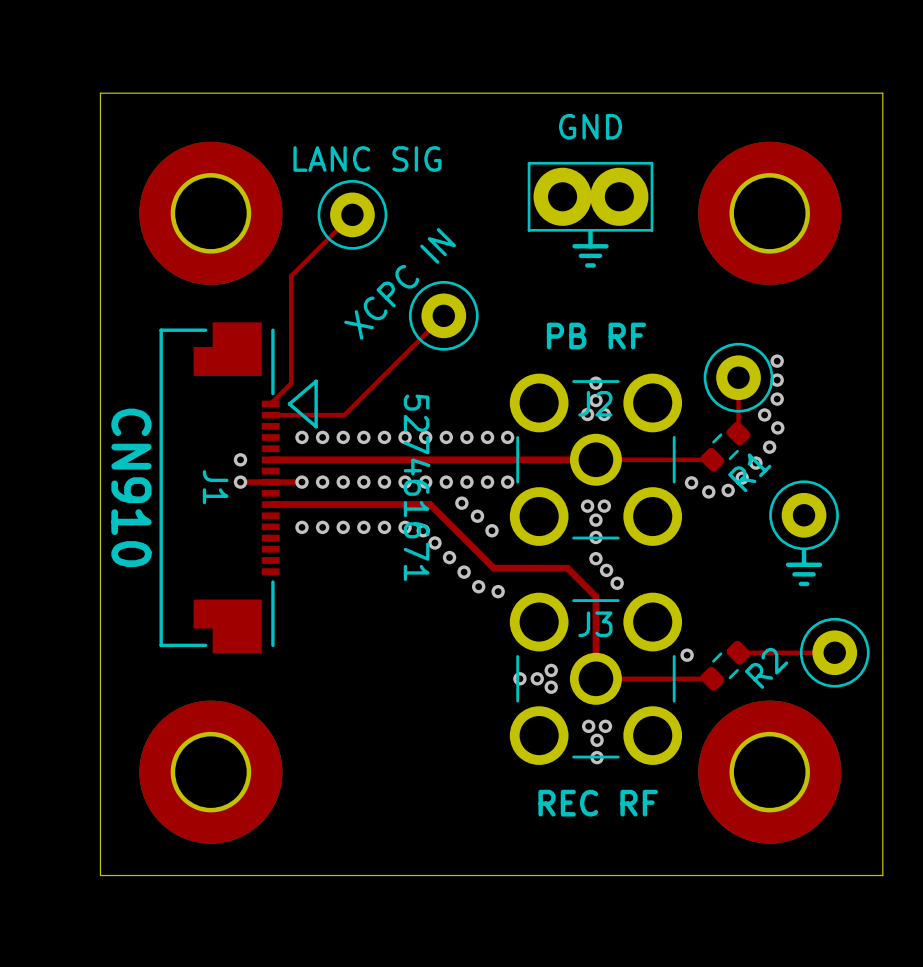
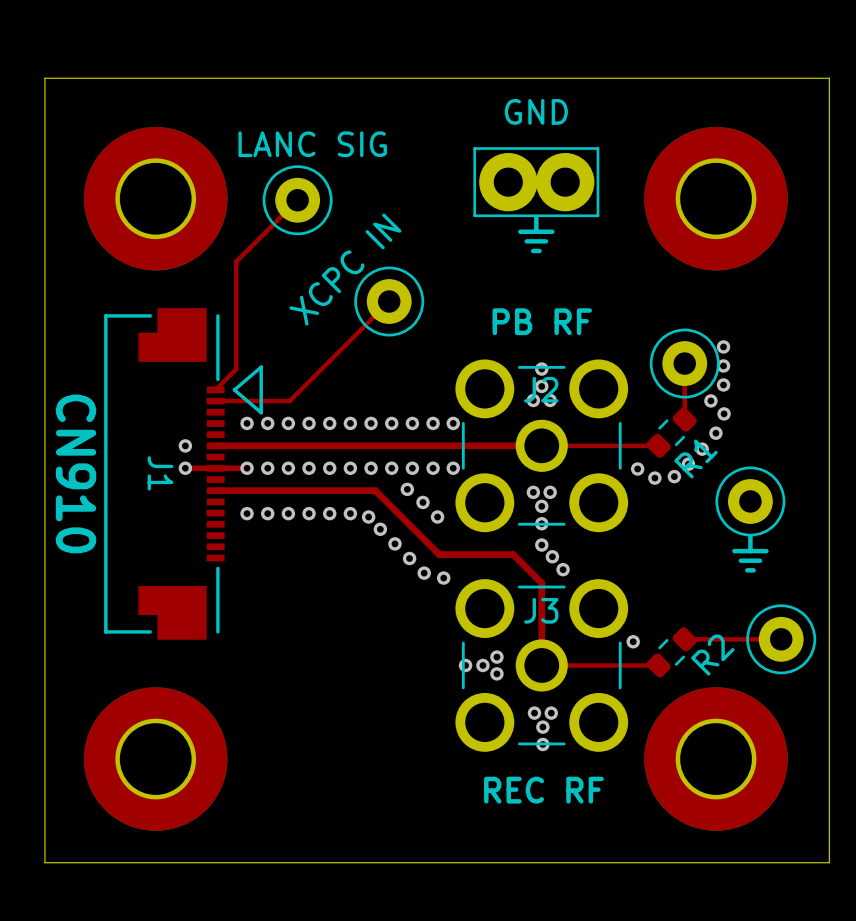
J1 text: 527461671 (417, 487) -> none

